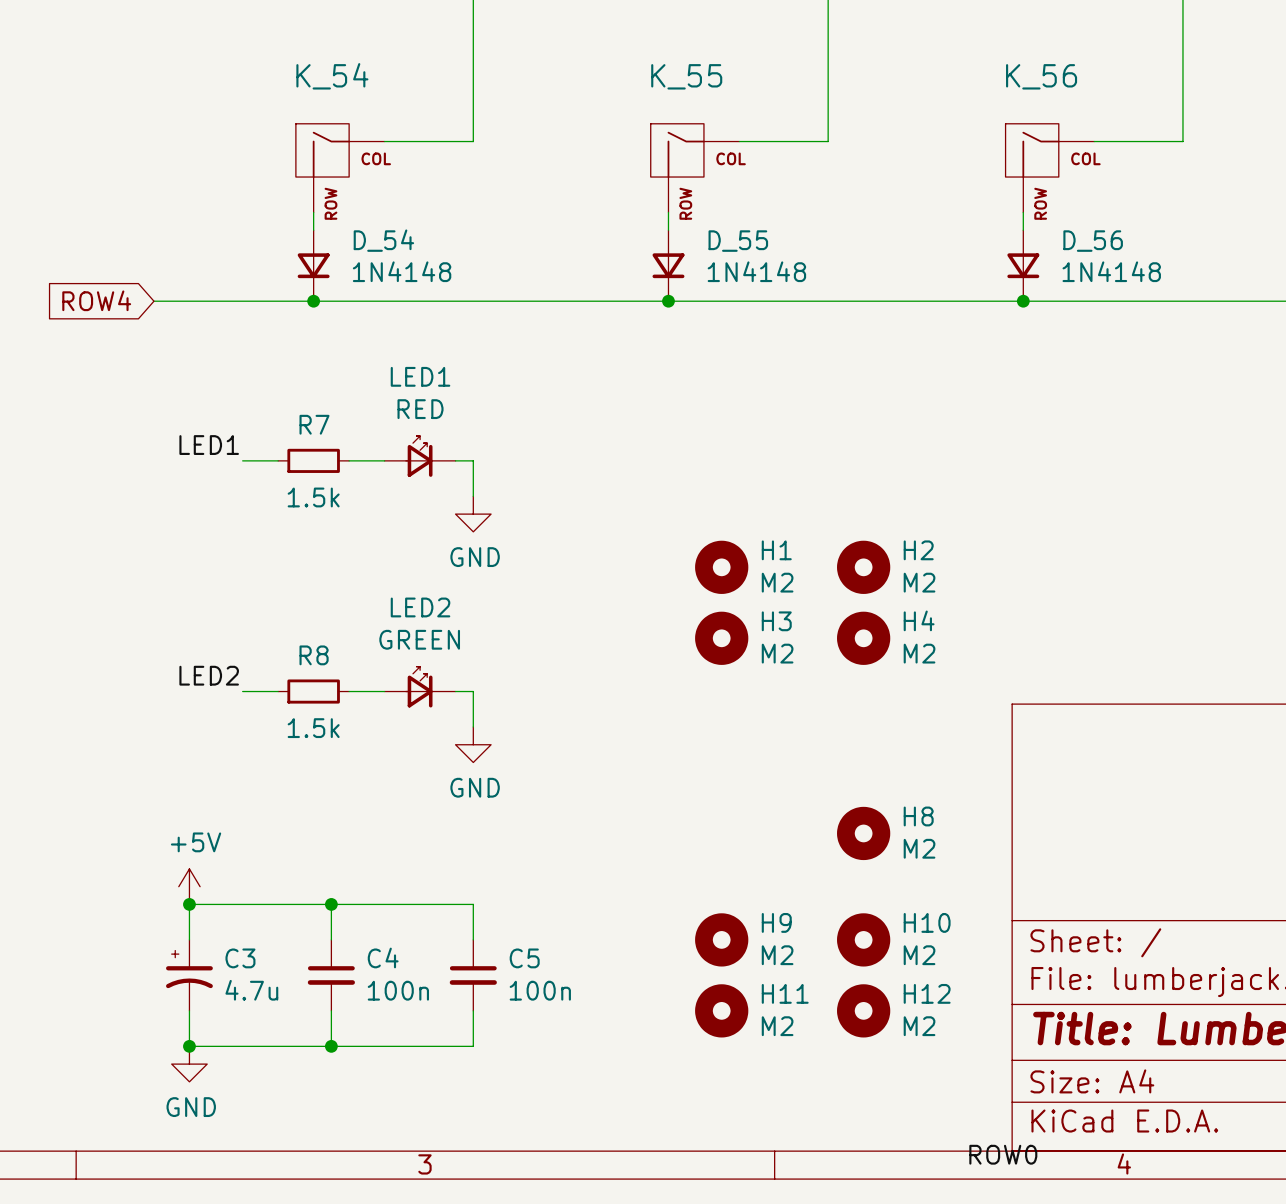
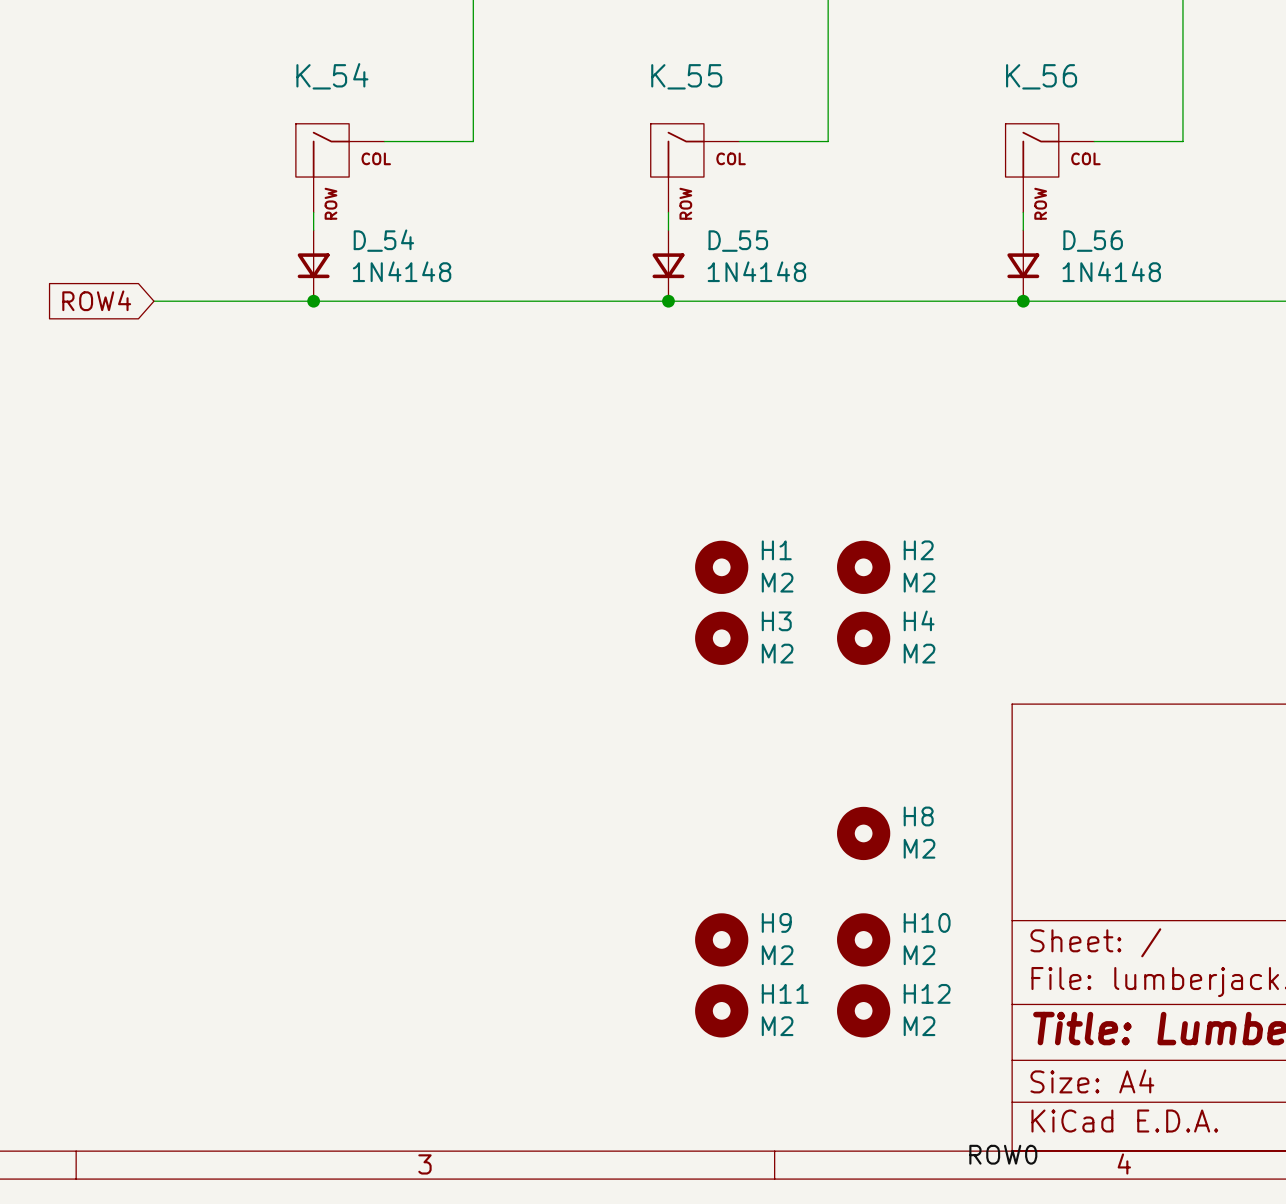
label: LED1 (209, 445) -> none
LED1: RED (420, 456) -> none
wire: (242, 460) (278, 460) -> none
R7: 1.5k (313, 460) -> none
wire: (349, 460) (384, 460) -> none
wire: (455, 460) (473, 460) (473, 496) -> none
power symbol: GND (473, 514) -> none
label: LED2 (209, 675) -> none
LED2: GREEN (420, 687) -> none
wire: (242, 691) (278, 691) -> none
R8: 1.5k (313, 691) -> none
wire: (349, 691) (384, 691) -> none
wire: (455, 691) (473, 691) (473, 727) -> none
power symbol: GND (473, 744) -> none
power symbol: +5V (189, 886) -> none
junction: (189, 904) -> none
wire: (331, 904) (331, 939) -> none
junction: (331, 904) -> none
wire: (189, 939) (189, 904) (473, 904) (473, 939) -> none
C3: 4.7u (189, 975) -> none
C4: 100n (331, 975) -> none
C5: 100n (473, 975) -> none
wire: (189, 1010) (189, 1046) (473, 1046) (473, 1010) -> none
wire: (331, 1010) (331, 1046) -> none
junction: (189, 1046) -> none
junction: (331, 1046) -> none
power symbol: GND (189, 1064) -> none

